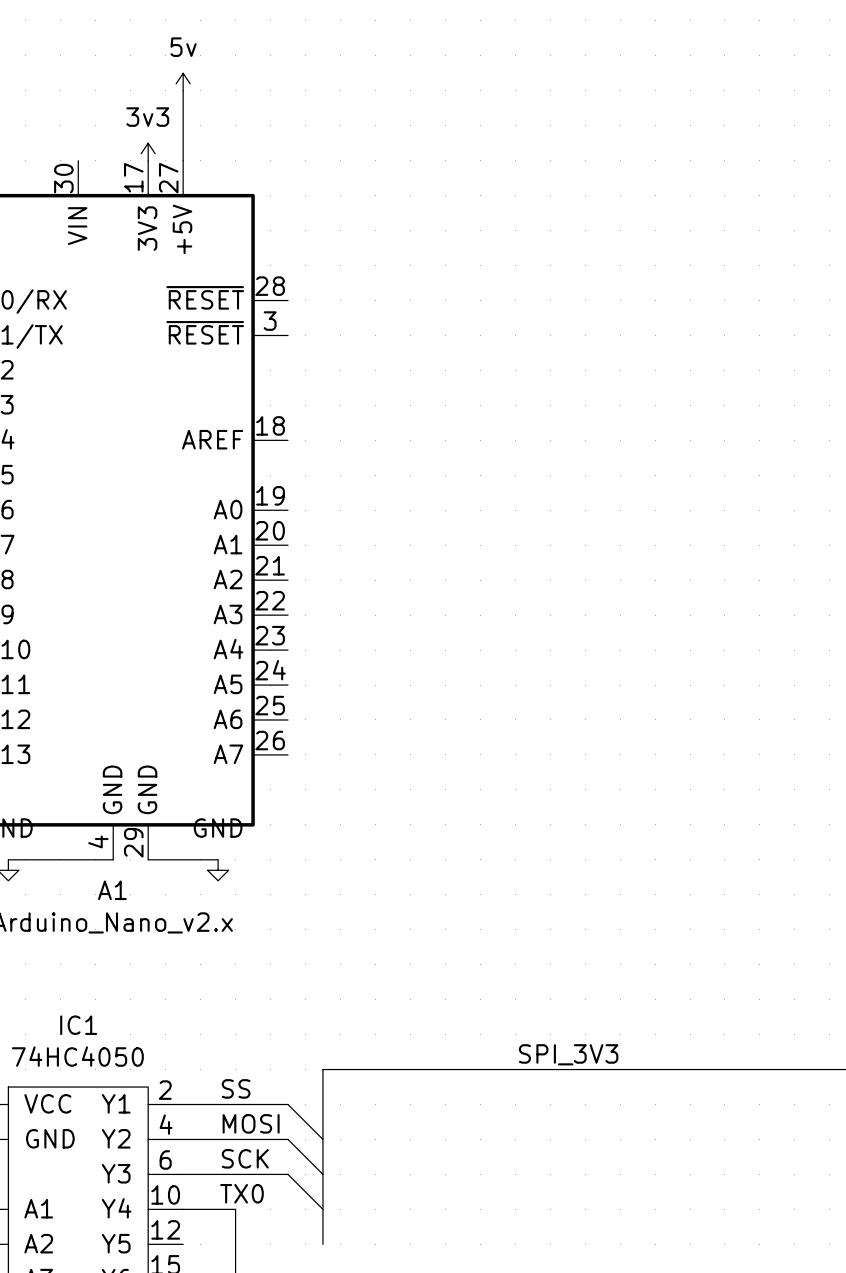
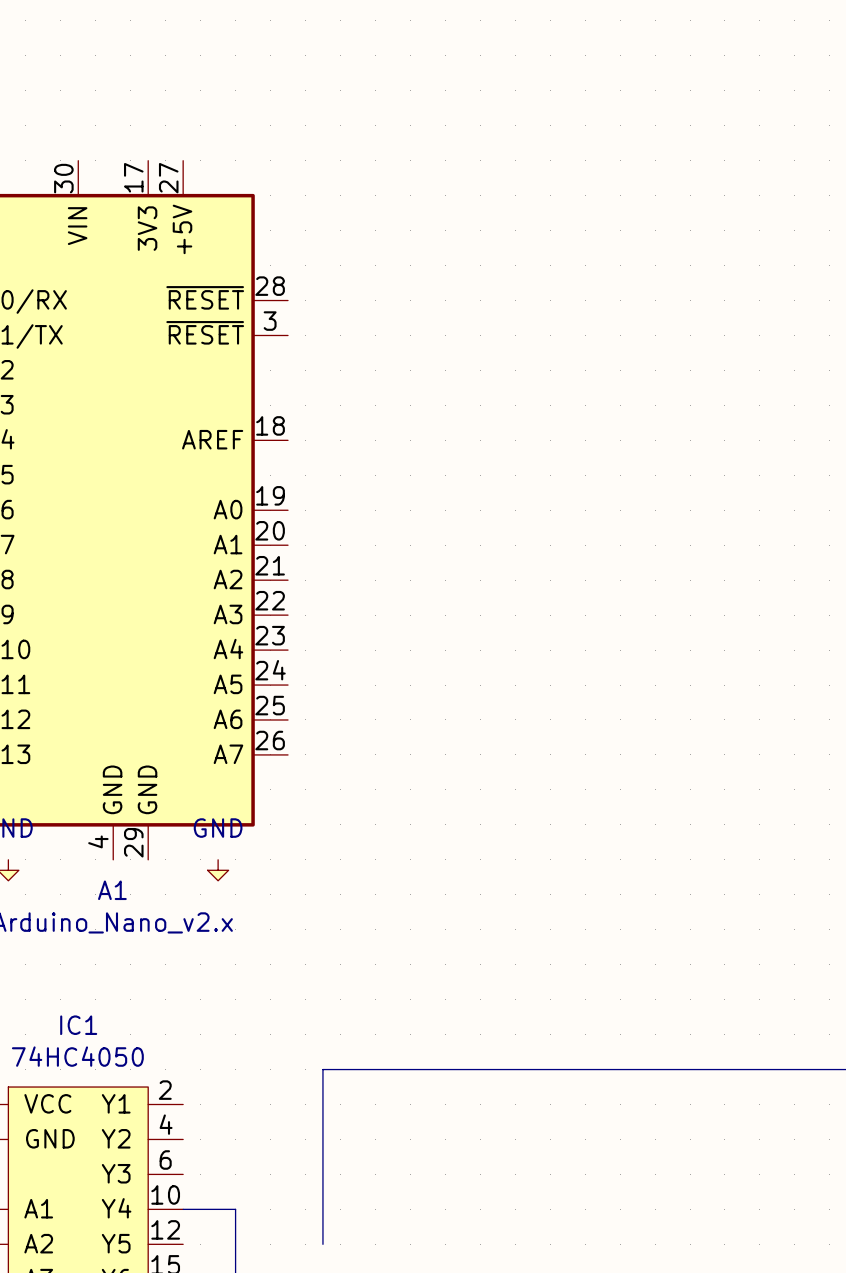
power symbol: 5v (183, 82) -> none
wire: (183, 90) (183, 160) -> none
power symbol: 3v3 (148, 151) -> none
wire: (8, 859) (113, 859) -> none
wire: (148, 859) (218, 859) -> none
label: SPI_3V3 (568, 1054) -> none
label: SS (236, 1088) -> none
wire: (183, 1104) (288, 1104) (322, 1139) -> none
label: MOSI (251, 1123) -> none
wire: (183, 1139) (288, 1139) (322, 1174) -> none
label: SCK (245, 1158) -> none
wire: (183, 1174) (288, 1174) (322, 1209) -> none
label: TX0 (241, 1193) -> none

